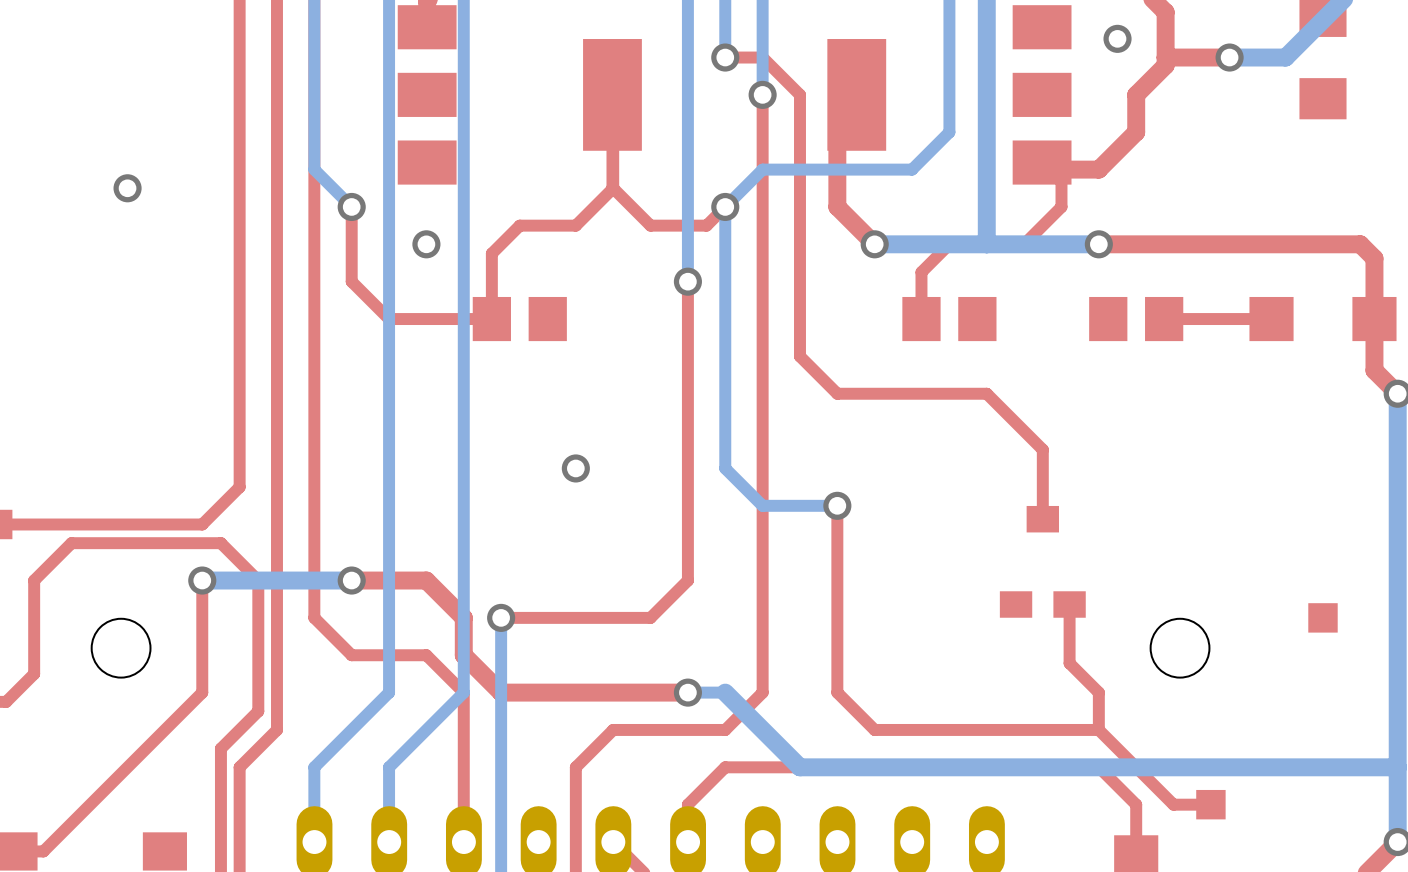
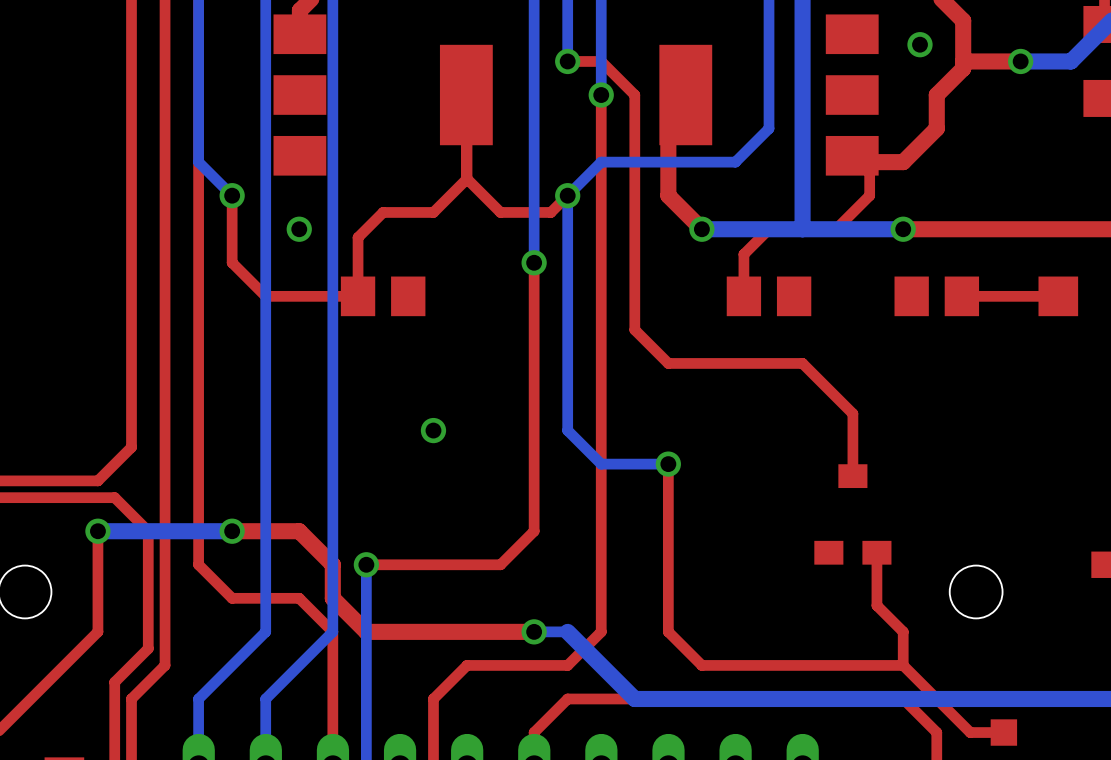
via: (127, 188) -> none

